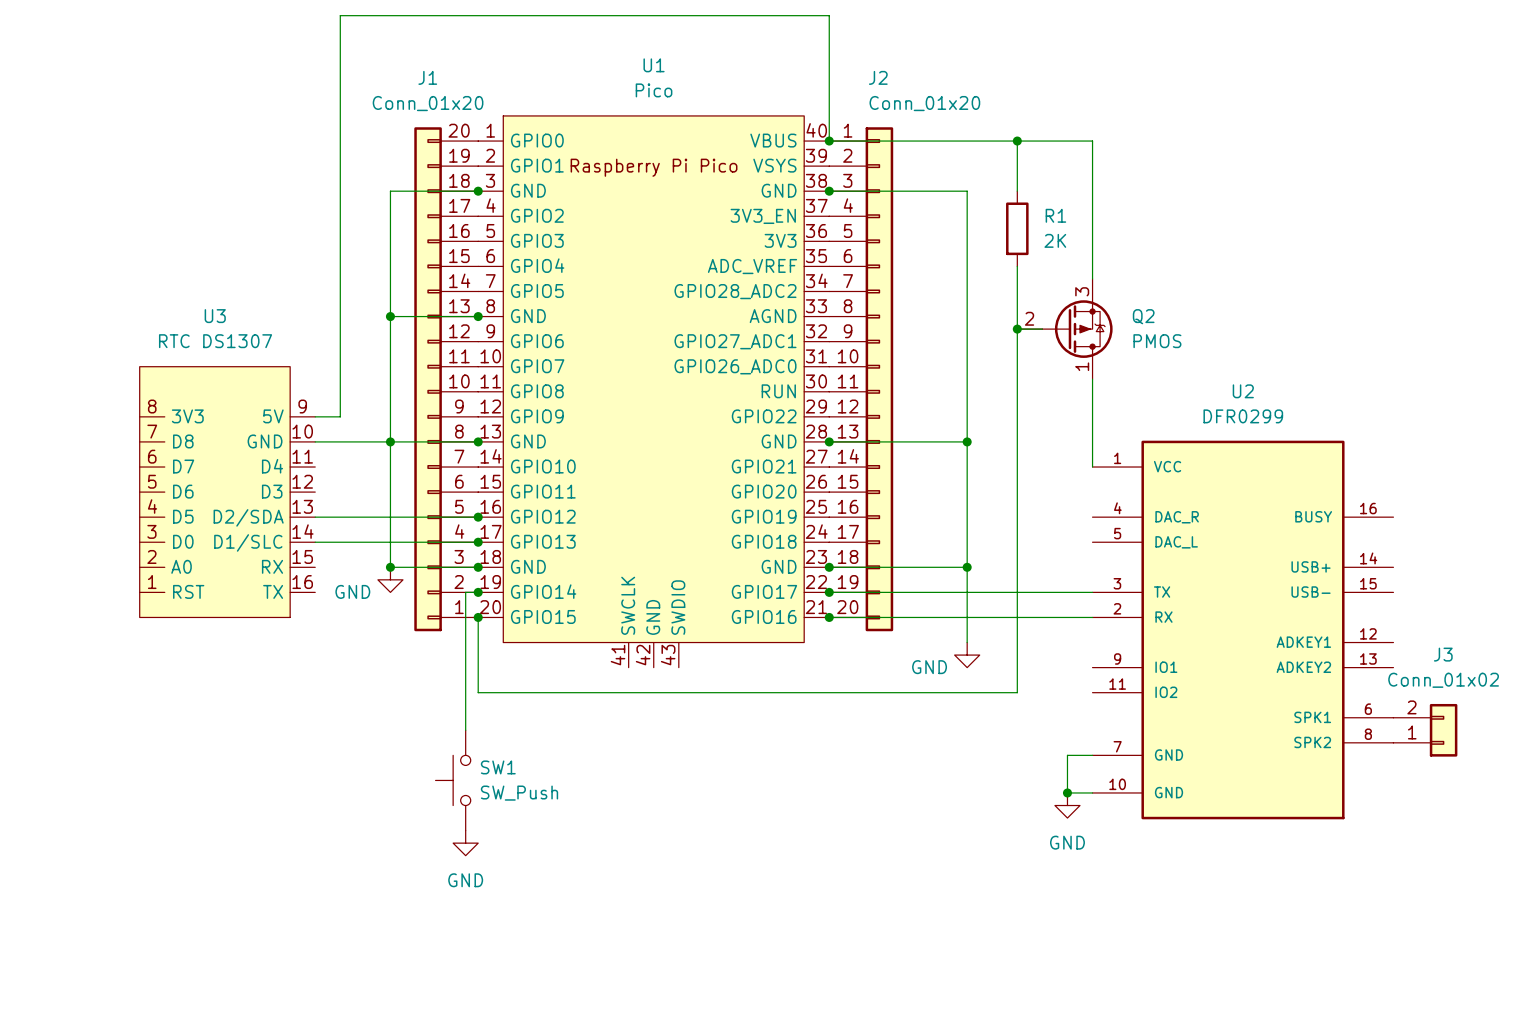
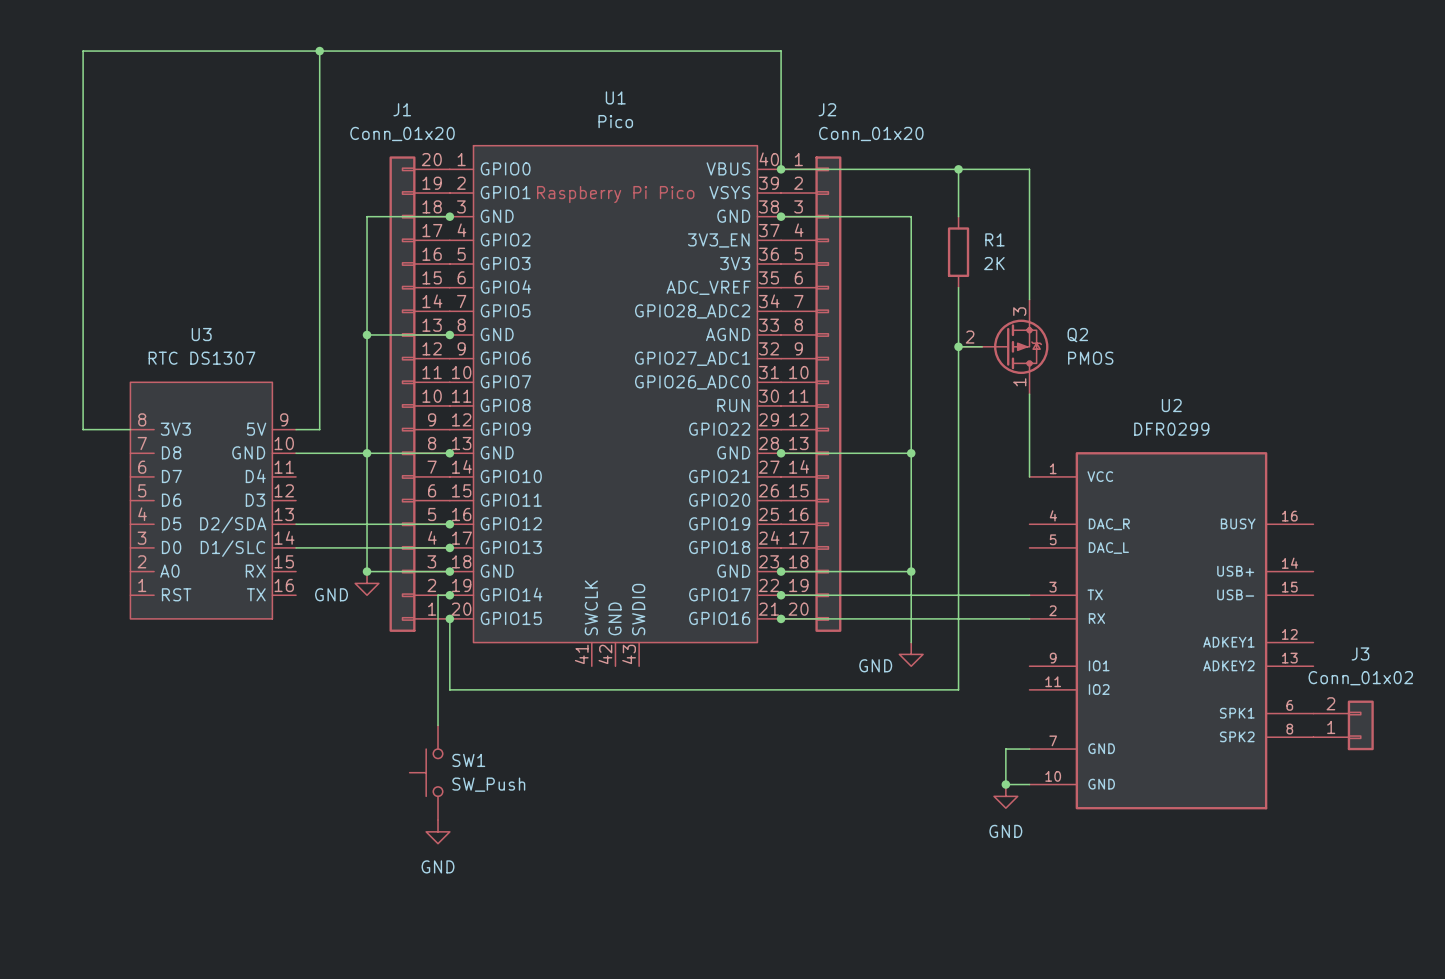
wire: none -> (319, 51) (83, 51) (83, 429) (130, 429)
junction: none -> (319, 51)

